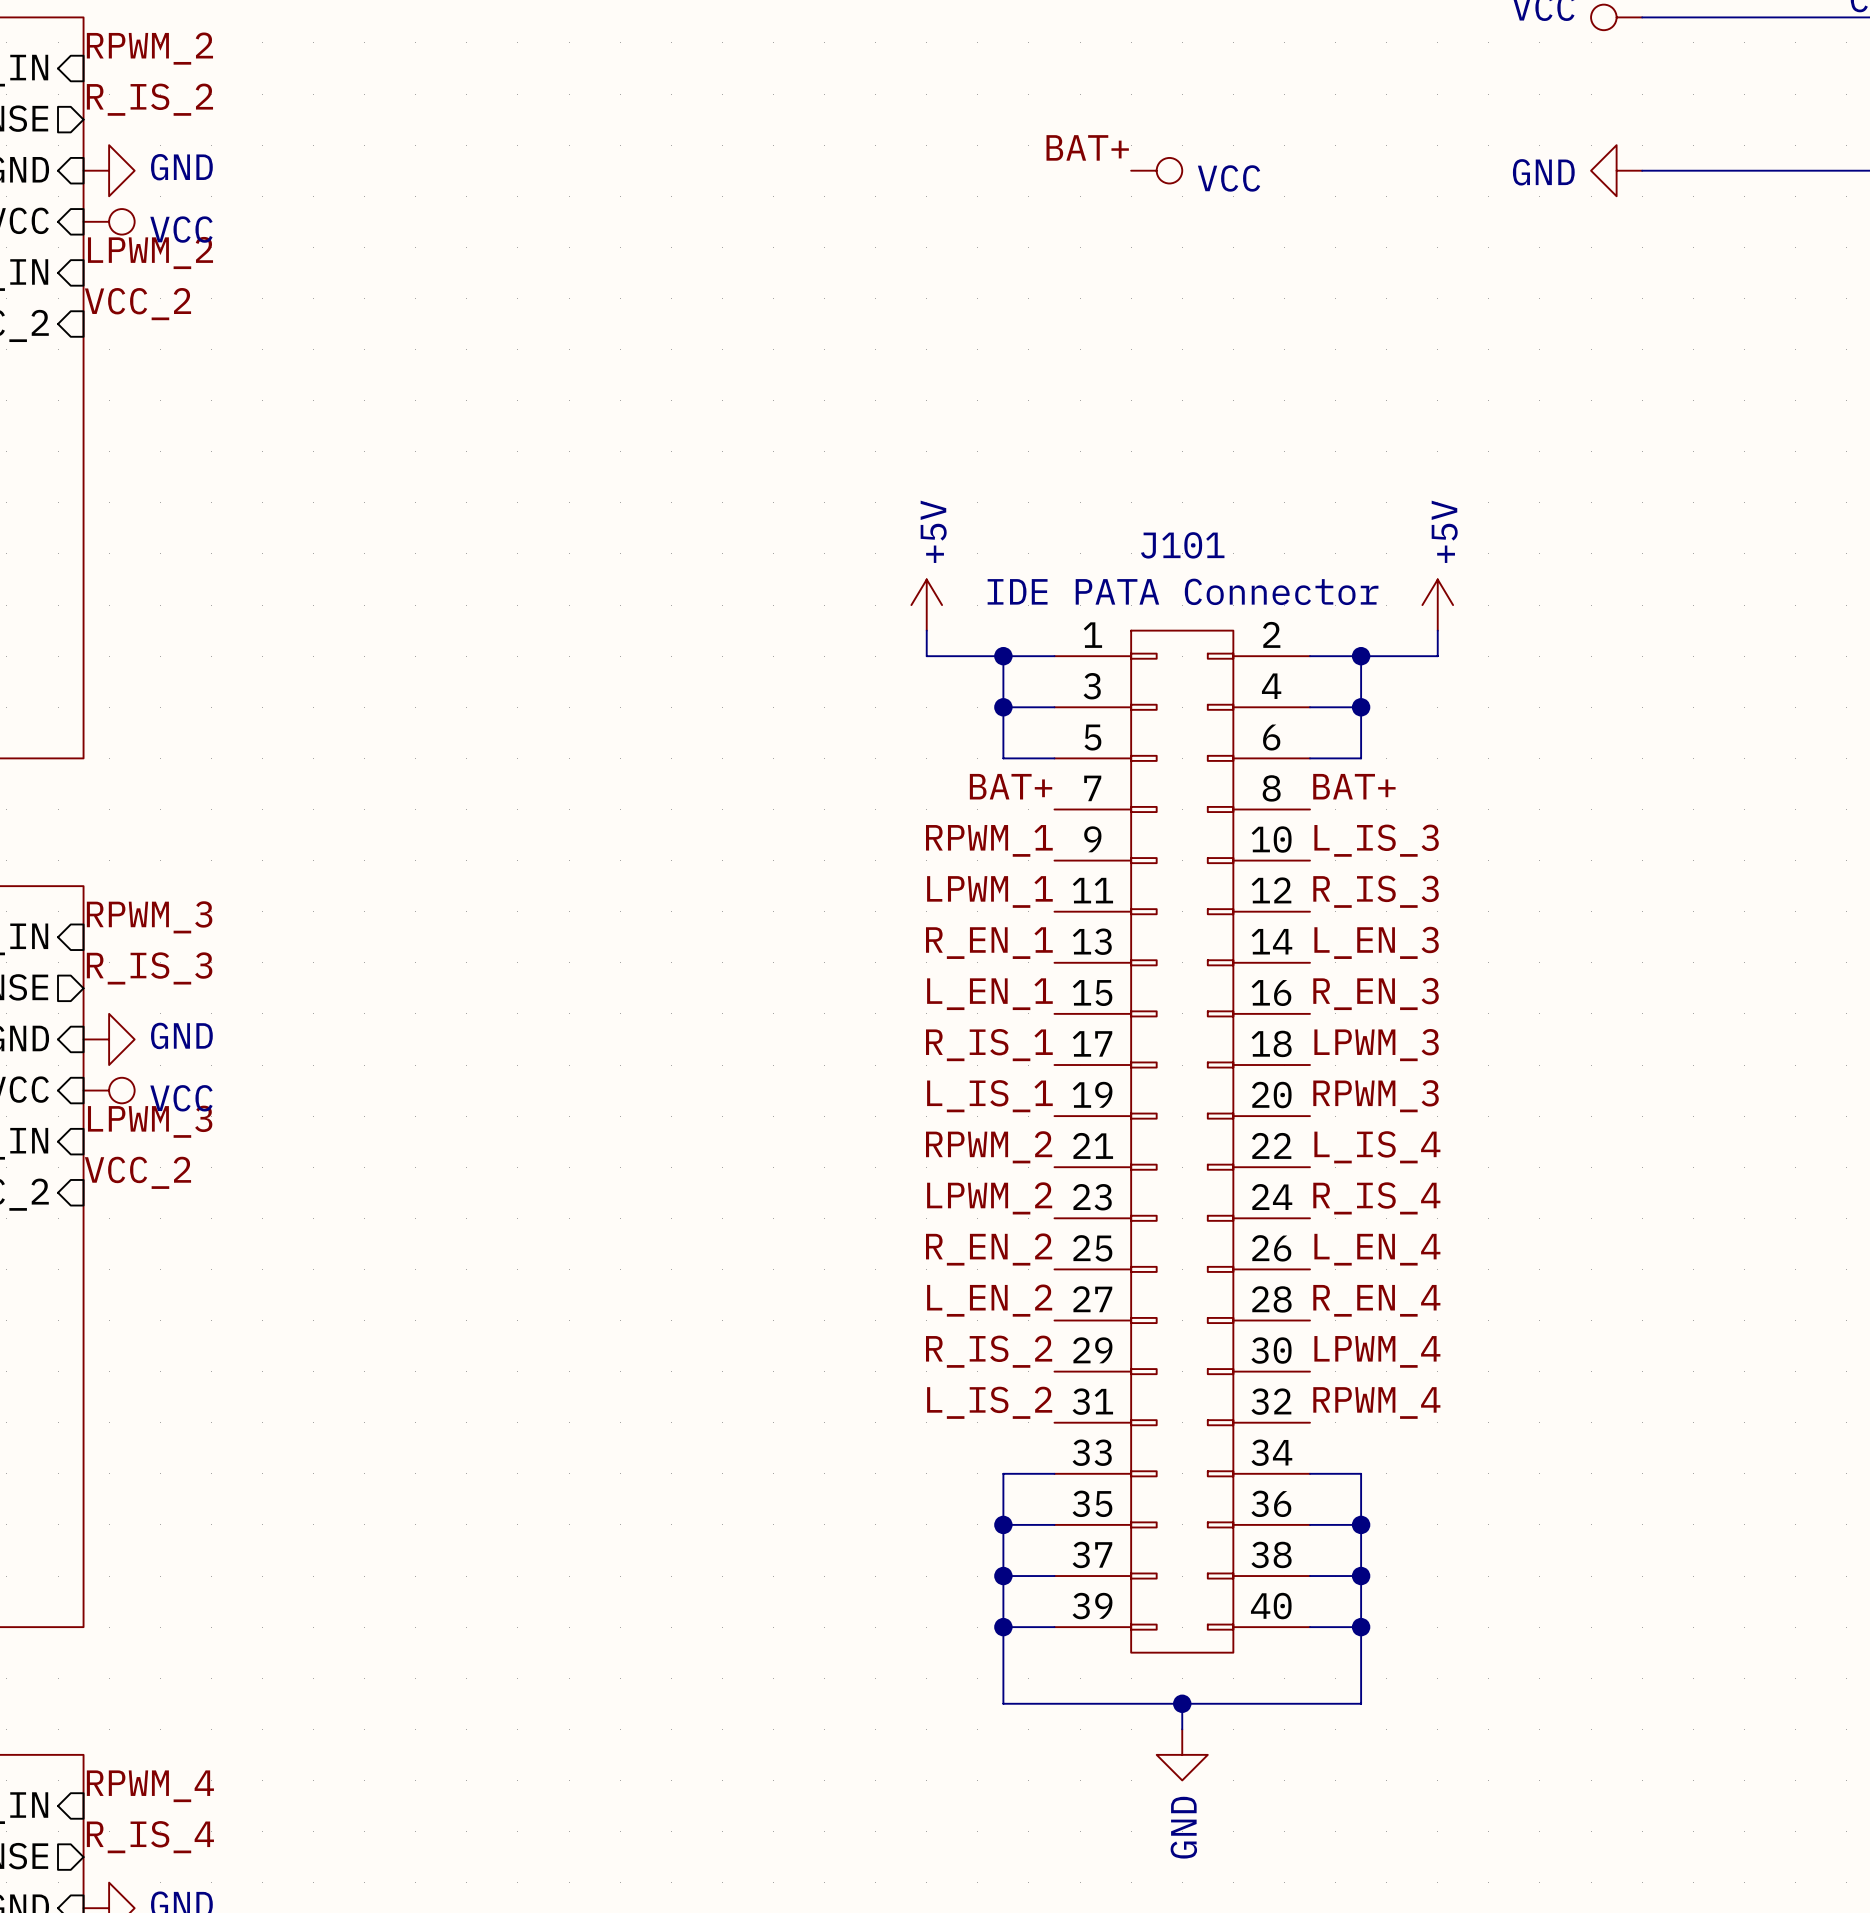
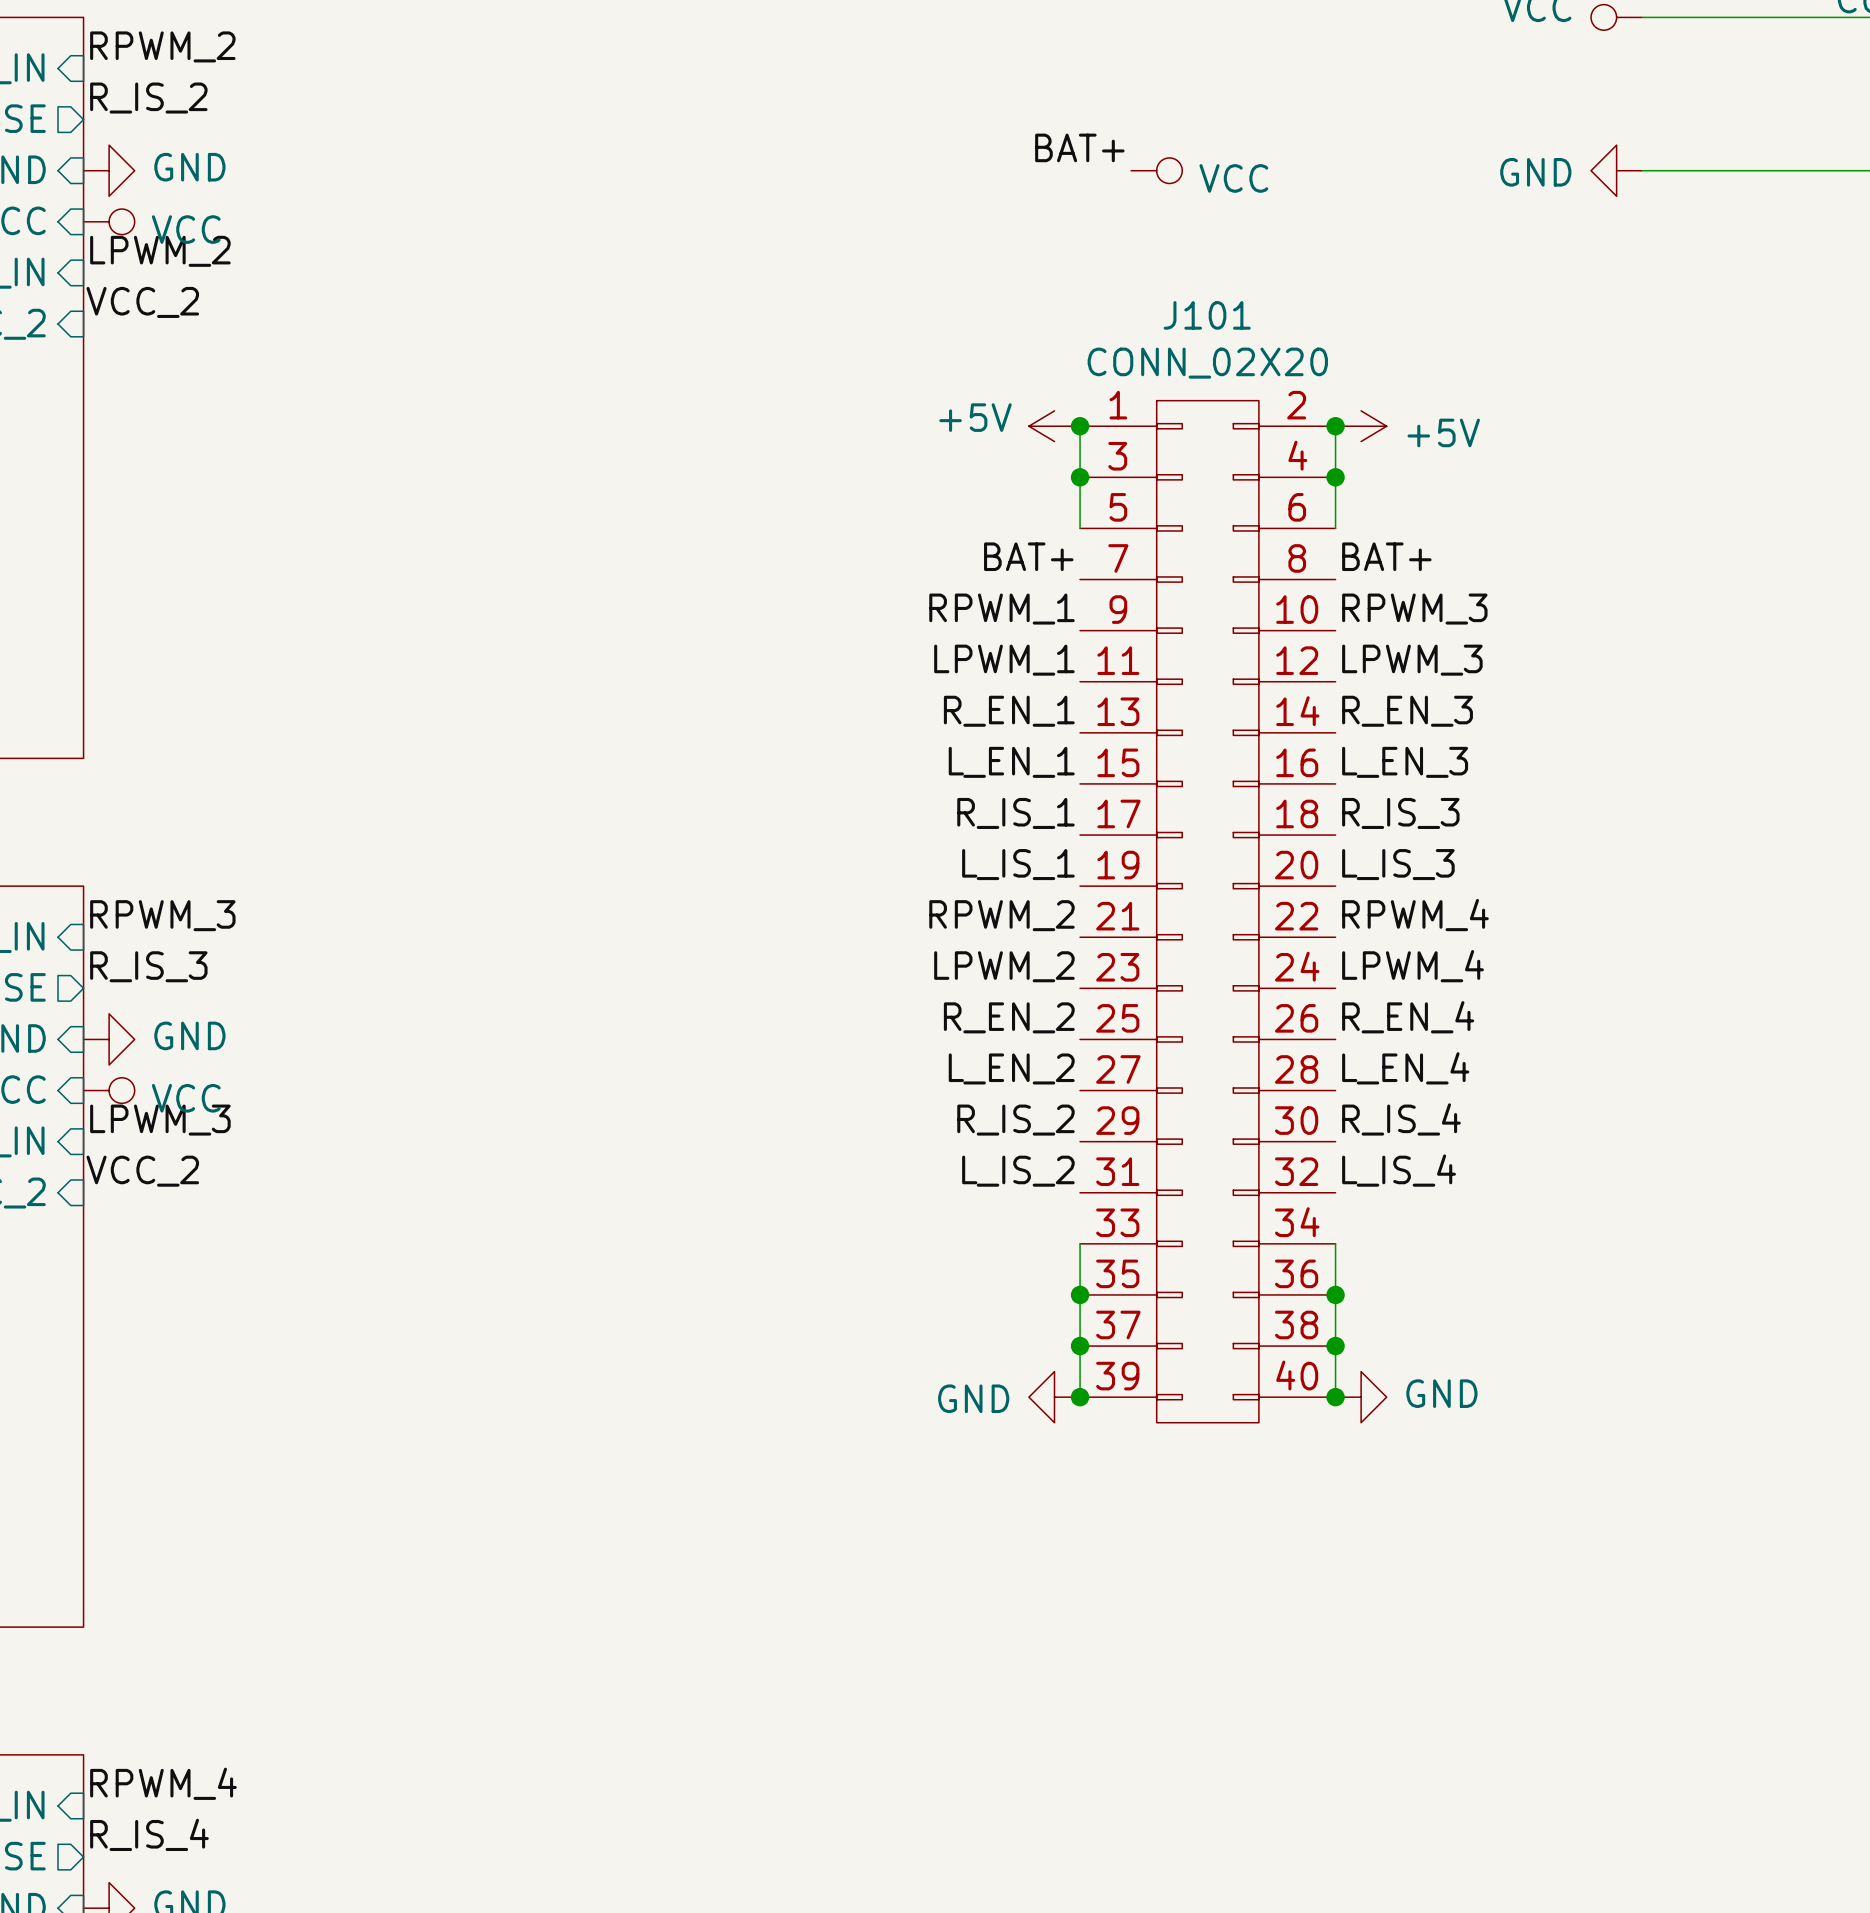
power symbol: none -> +5V (1054, 426)
wire: none -> (1080, 426) (1080, 528)
junction: none -> (1080, 426)
wire: none -> (1335, 426) (1335, 528)
junction: none -> (1335, 426)
junction: none -> (1080, 477)
junction: none -> (1335, 477)
label: none -> BAT+ (1028, 556)
label: none -> BAT+ (1386, 556)
J101 value: IDE PATA Connector (1183, 591) -> CONN_02X20 (1207, 363)
power symbol: +5V (926, 605) -> none
power symbol rotation: 0° (1437, 605) -> 90° clockwise (1361, 426)
power symbol position: +5V (1437, 605) -> +5V (1361, 426)
wire: (926, 630) (926, 656) (1054, 656) -> none
wire: (1437, 630) (1437, 656) (1310, 656) -> none
wire: (1003, 656) (1003, 758) (1054, 758) -> none
junction: (1003, 656) -> none
wire: (1361, 656) (1361, 758) (1310, 758) -> none
junction: (1361, 656) -> none
wire: (1003, 707) (1054, 707) -> none
junction: (1003, 707) -> none
wire: (1310, 707) (1361, 707) -> none
junction: (1361, 707) -> none
label: BAT+ (1011, 786) -> none
label: BAT+ (1354, 786) -> none
label position: RPWM_1 (989, 840) -> RPWM_1 (1001, 609)
label position: L_IS_3 (1376, 840) -> L_IS_3 (1398, 864)
label position: LPWM_1 (989, 891) -> LPWM_1 (1004, 660)
label position: R_IS_3 (1376, 891) -> R_IS_3 (1400, 813)
label position: L_EN_3 (1376, 942) -> L_EN_3 (1405, 762)
label position: R_EN_1 (989, 943) -> R_EN_1 (1009, 711)
label position: R_EN_3 (1376, 993) -> R_EN_3 (1407, 711)
label position: L_EN_1 (989, 994) -> L_EN_1 (1011, 762)
label position: R_IS_1 (989, 1045) -> R_IS_1 (1015, 813)
label position: LPWM_3 (1376, 1045) -> LPWM_3 (1412, 660)
label position: L_IS_1 (989, 1096) -> L_IS_1 (1018, 864)
label position: RPWM_3 (1376, 1096) -> RPWM_3 (1414, 609)
J101 position: (1182, 1141) -> (1207, 911)
label position: RPWM_2 (989, 1147) -> RPWM_2 (1001, 915)
label position: L_IS_4 (1377, 1147) -> L_IS_4 (1399, 1170)
label position: LPWM_2 (989, 1198) -> LPWM_2 (1004, 966)
label position: R_IS_4 (1376, 1198) -> R_IS_4 (1401, 1119)
wire: none -> (1080, 1243) (1080, 1397)
wire: none -> (1335, 1243) (1335, 1397)
label position: R_EN_2 (989, 1249) -> R_EN_2 (1009, 1017)
label position: L_EN_4 (1377, 1249) -> L_EN_4 (1405, 1068)
junction: none -> (1080, 1294)
junction: none -> (1335, 1294)
label position: L_EN_2 (989, 1300) -> L_EN_2 (1011, 1068)
label position: R_EN_4 (1376, 1300) -> R_EN_4 (1408, 1017)
junction: none -> (1080, 1346)
junction: none -> (1335, 1346)
label position: R_IS_2 (989, 1351) -> R_IS_2 (1015, 1120)
label position: LPWM_4 (1377, 1351) -> LPWM_4 (1413, 966)
power symbol: none -> GND (1054, 1397)
junction: none -> (1080, 1397)
junction: none -> (1335, 1397)
power symbol: none -> GND (1361, 1397)
label position: L_IS_2 (989, 1402) -> L_IS_2 (1018, 1171)
label position: RPWM_4 (1376, 1403) -> RPWM_4 (1415, 915)
wire: (1054, 1473) (1003, 1473) (1003, 1703) (1361, 1703) (1361, 1473) (1310, 1473) -> none
wire: (1003, 1524) (1054, 1524) -> none
junction: (1003, 1524) -> none
wire: (1310, 1524) (1361, 1524) -> none
junction: (1361, 1524) -> none
wire: (1003, 1576) (1054, 1576) -> none
junction: (1003, 1576) -> none
wire: (1310, 1576) (1361, 1576) -> none
junction: (1361, 1576) -> none
wire: (1003, 1627) (1054, 1627) -> none
junction: (1003, 1627) -> none
wire: (1310, 1627) (1361, 1627) -> none
junction: (1361, 1627) -> none
wire: (1182, 1703) (1182, 1729) -> none
junction: (1182, 1703) -> none
power symbol: GND (1182, 1754) -> none

